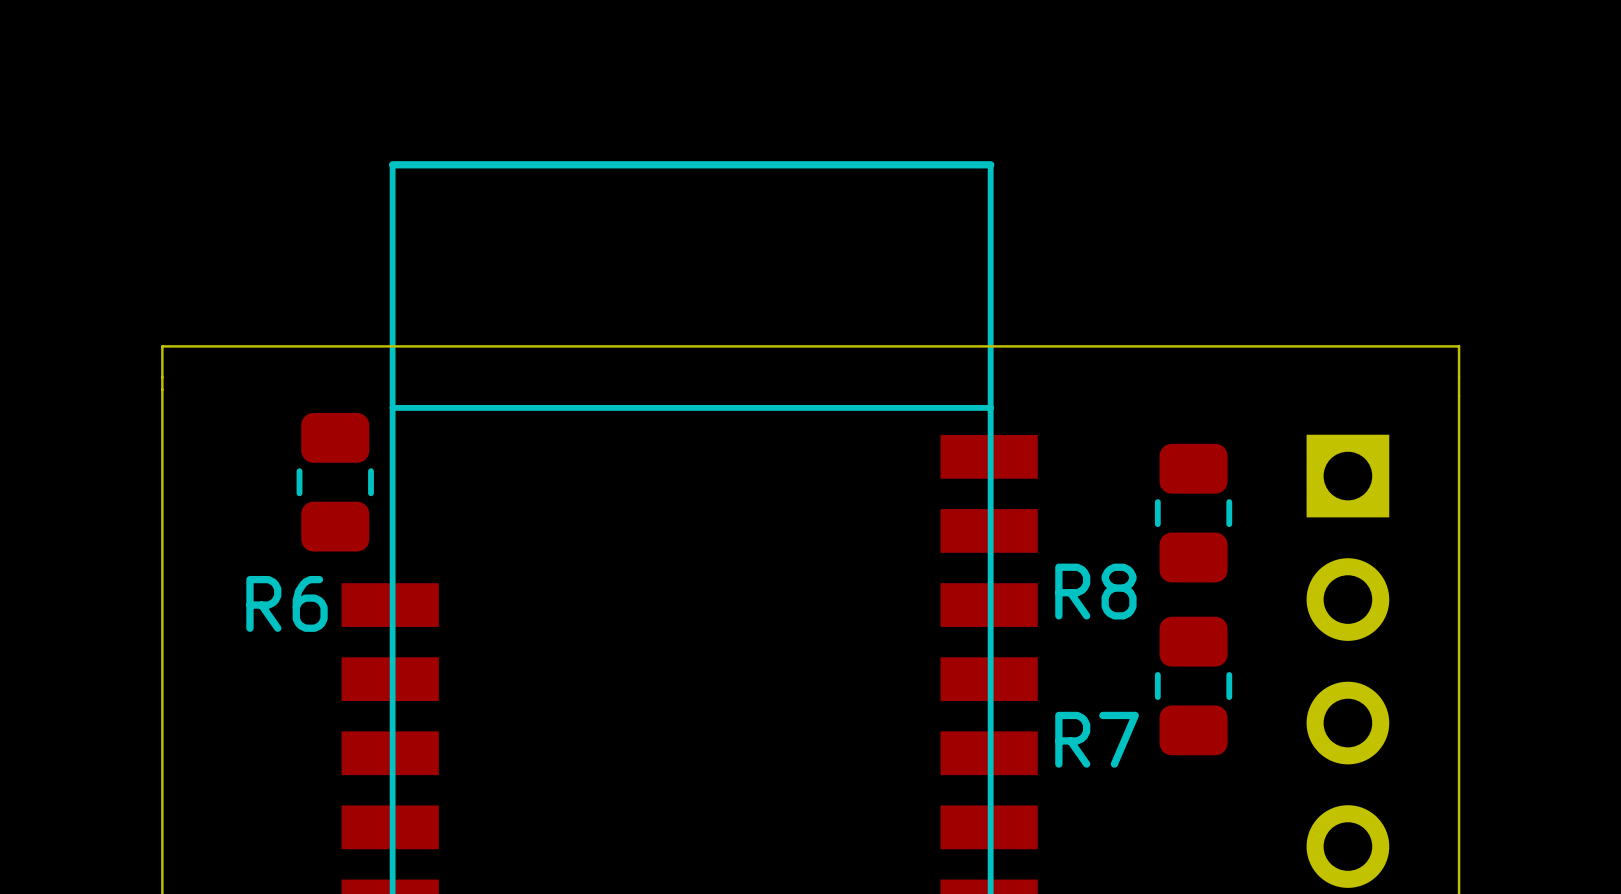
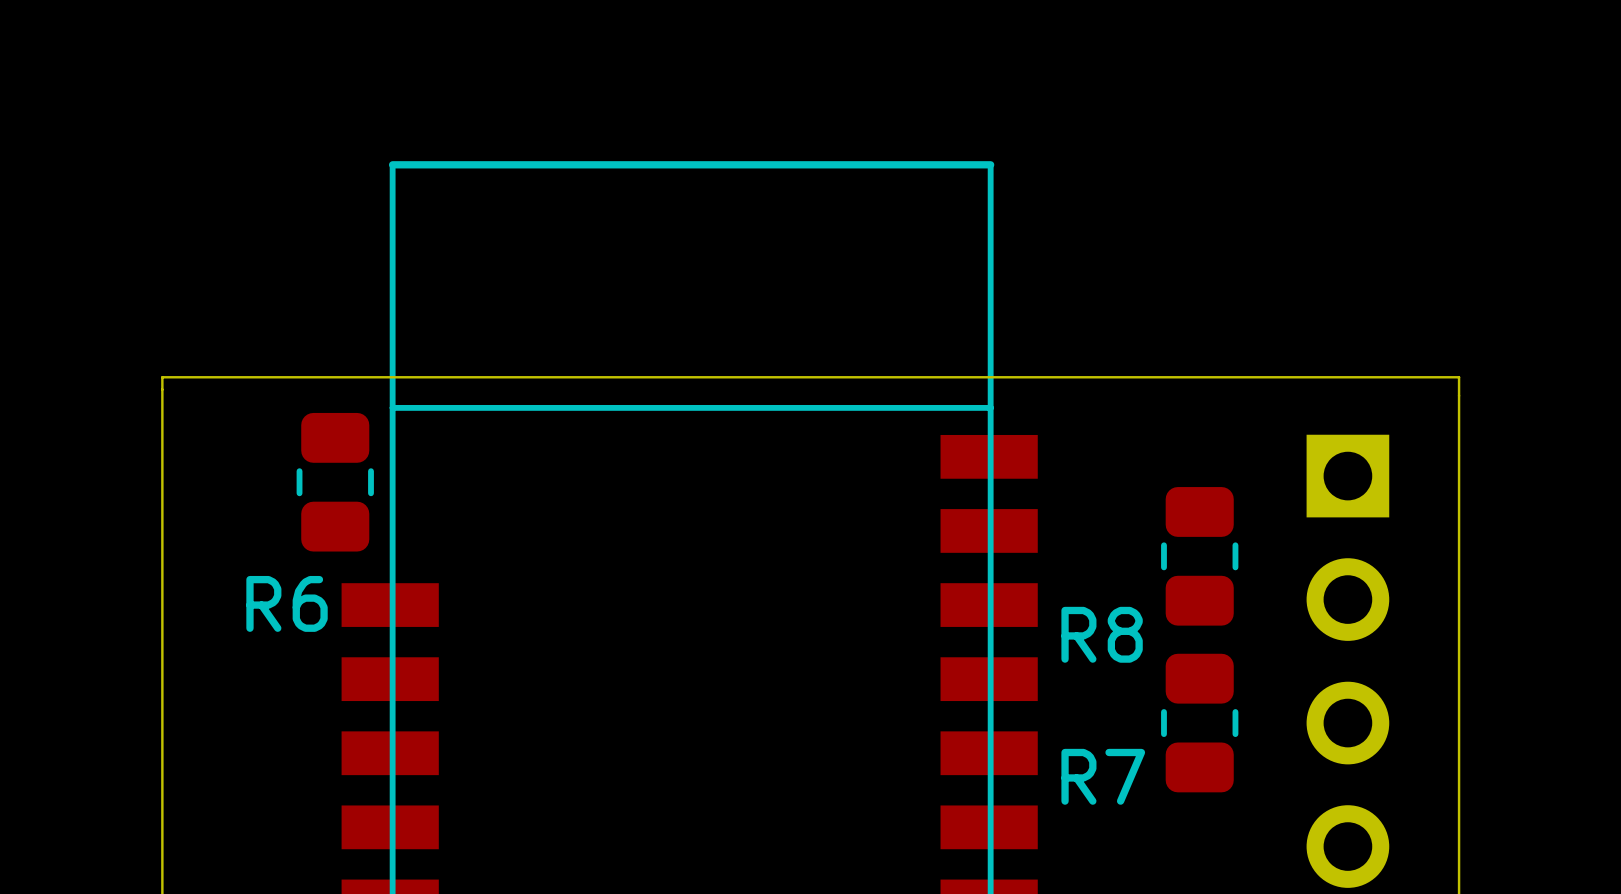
board edge: (162, 377) (162, 346) (1459, 346) (1459, 377) -> (162, 377) (1459, 377)
R8 position: (1193, 513) -> (1199, 556)
R7 position: (1193, 686) -> (1199, 723)

